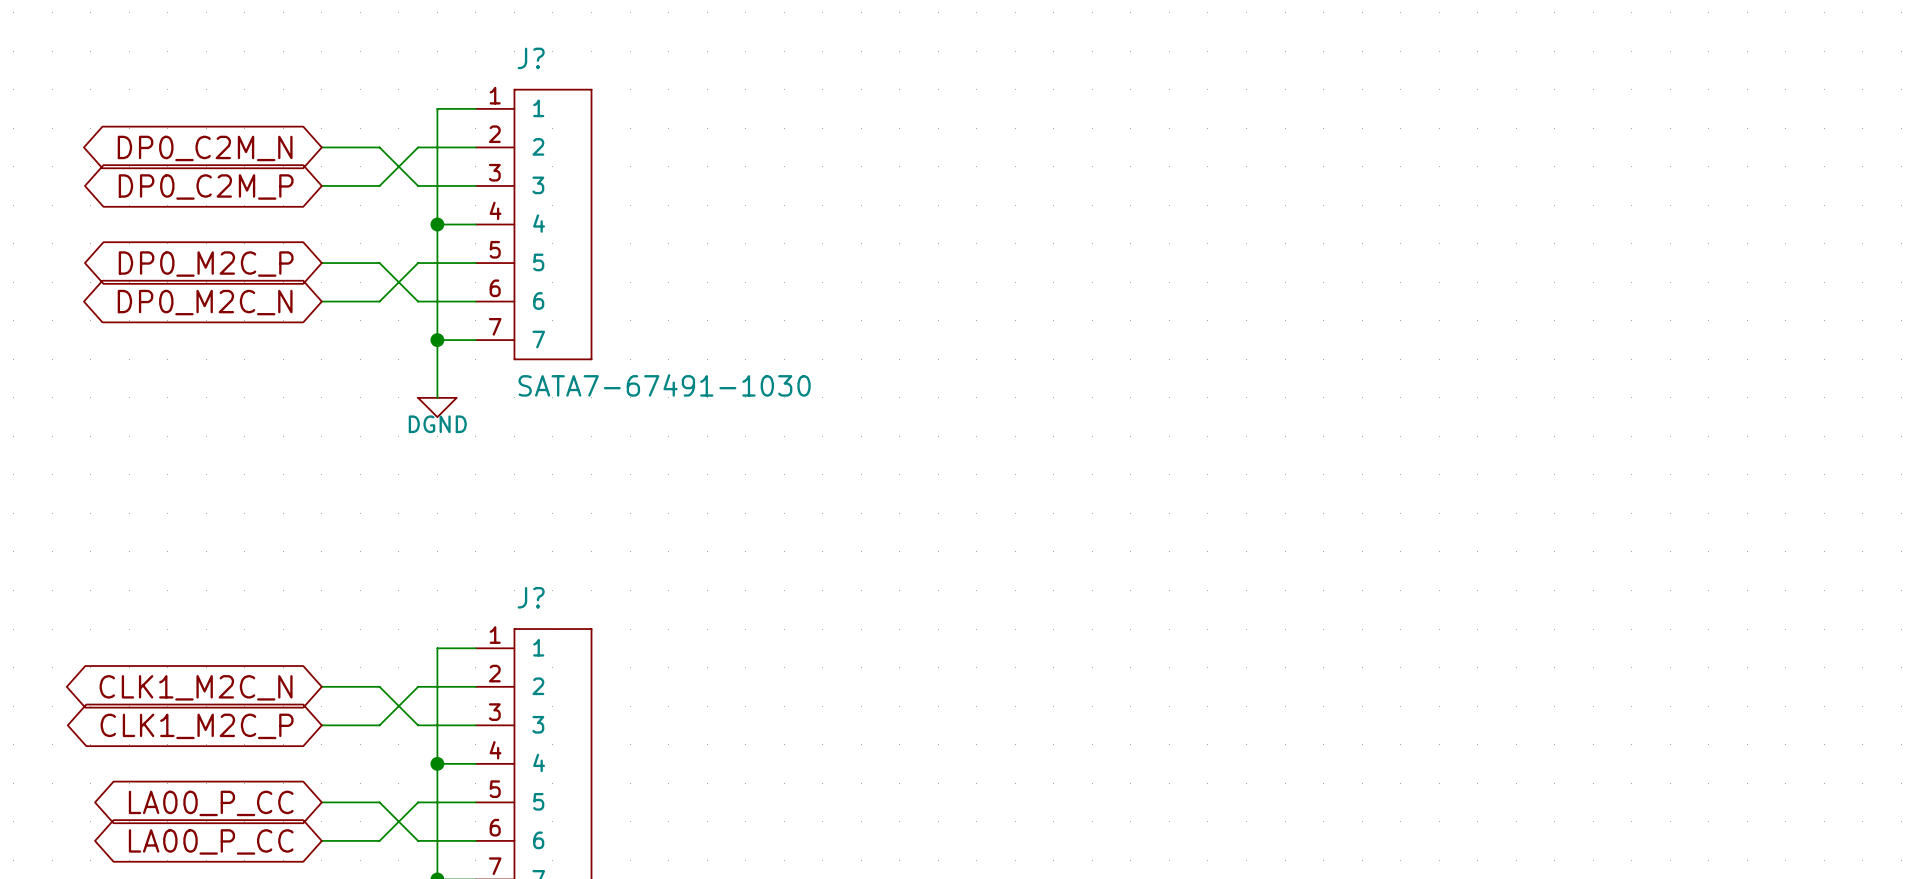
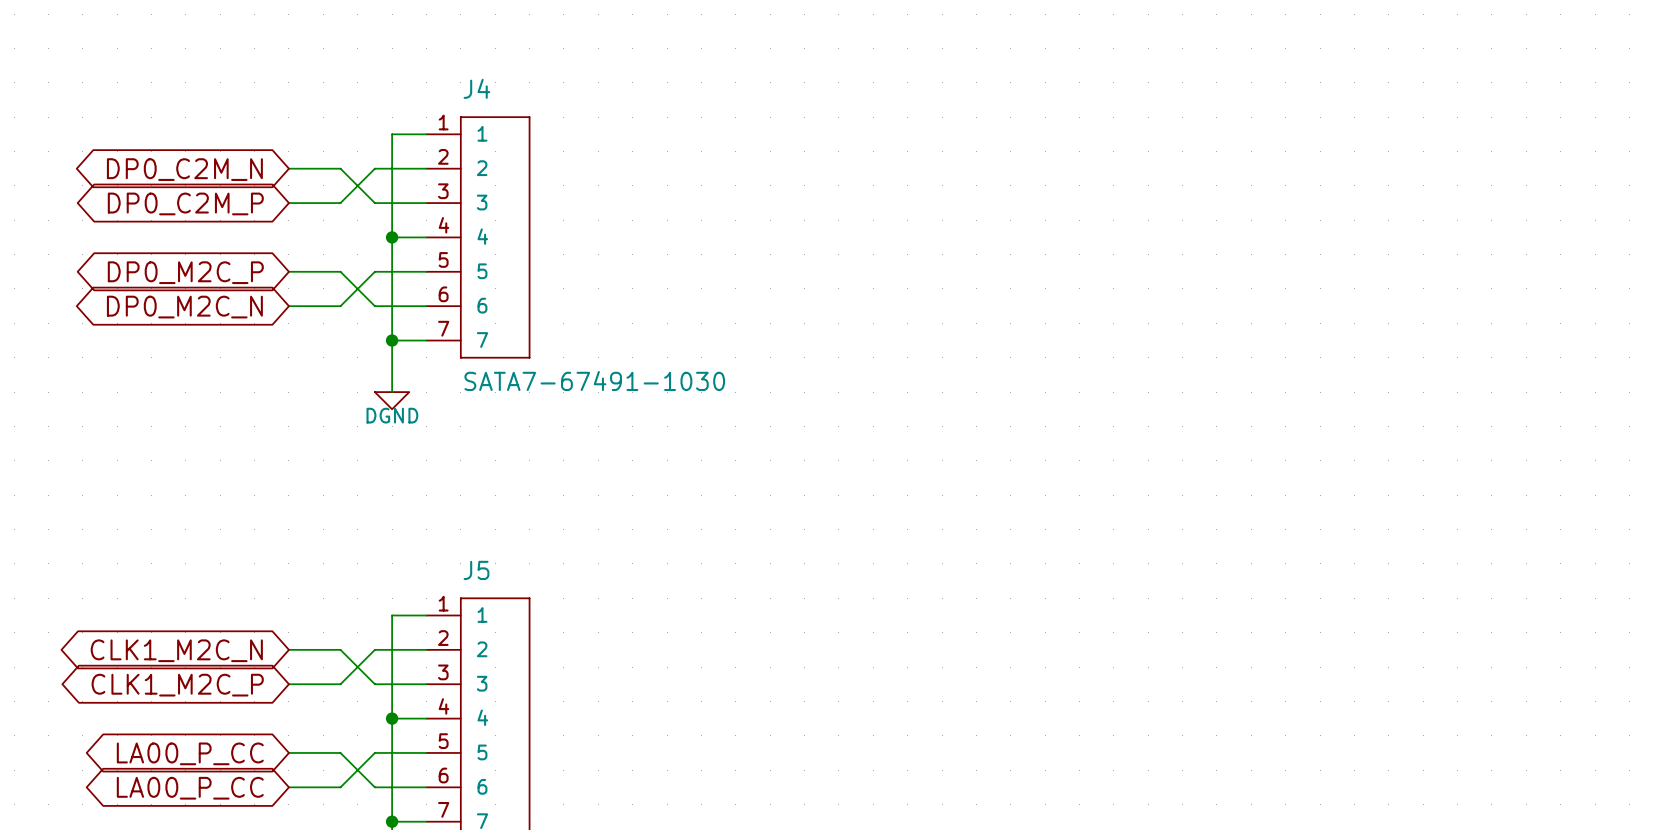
J? name: J? (531, 58) -> J4 (476, 88)
J? name: J? (531, 597) -> J5 (476, 570)

